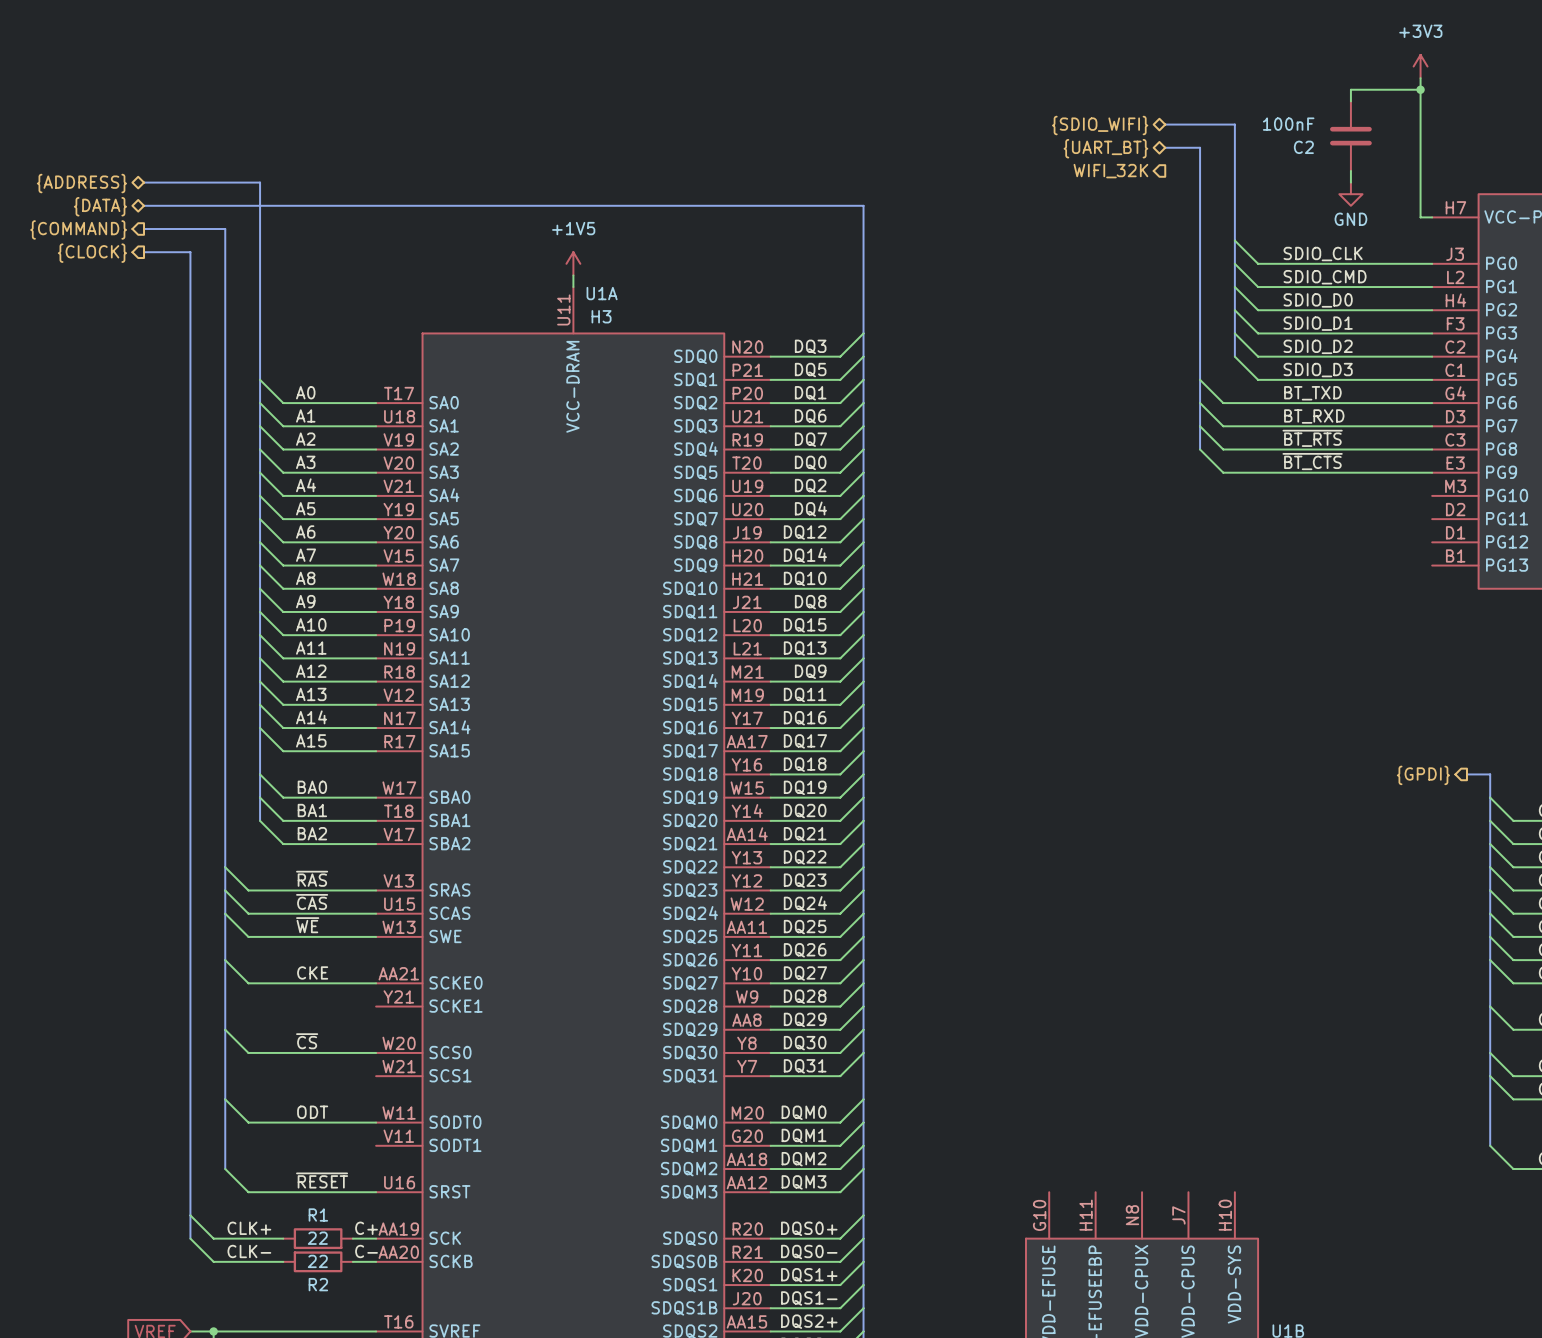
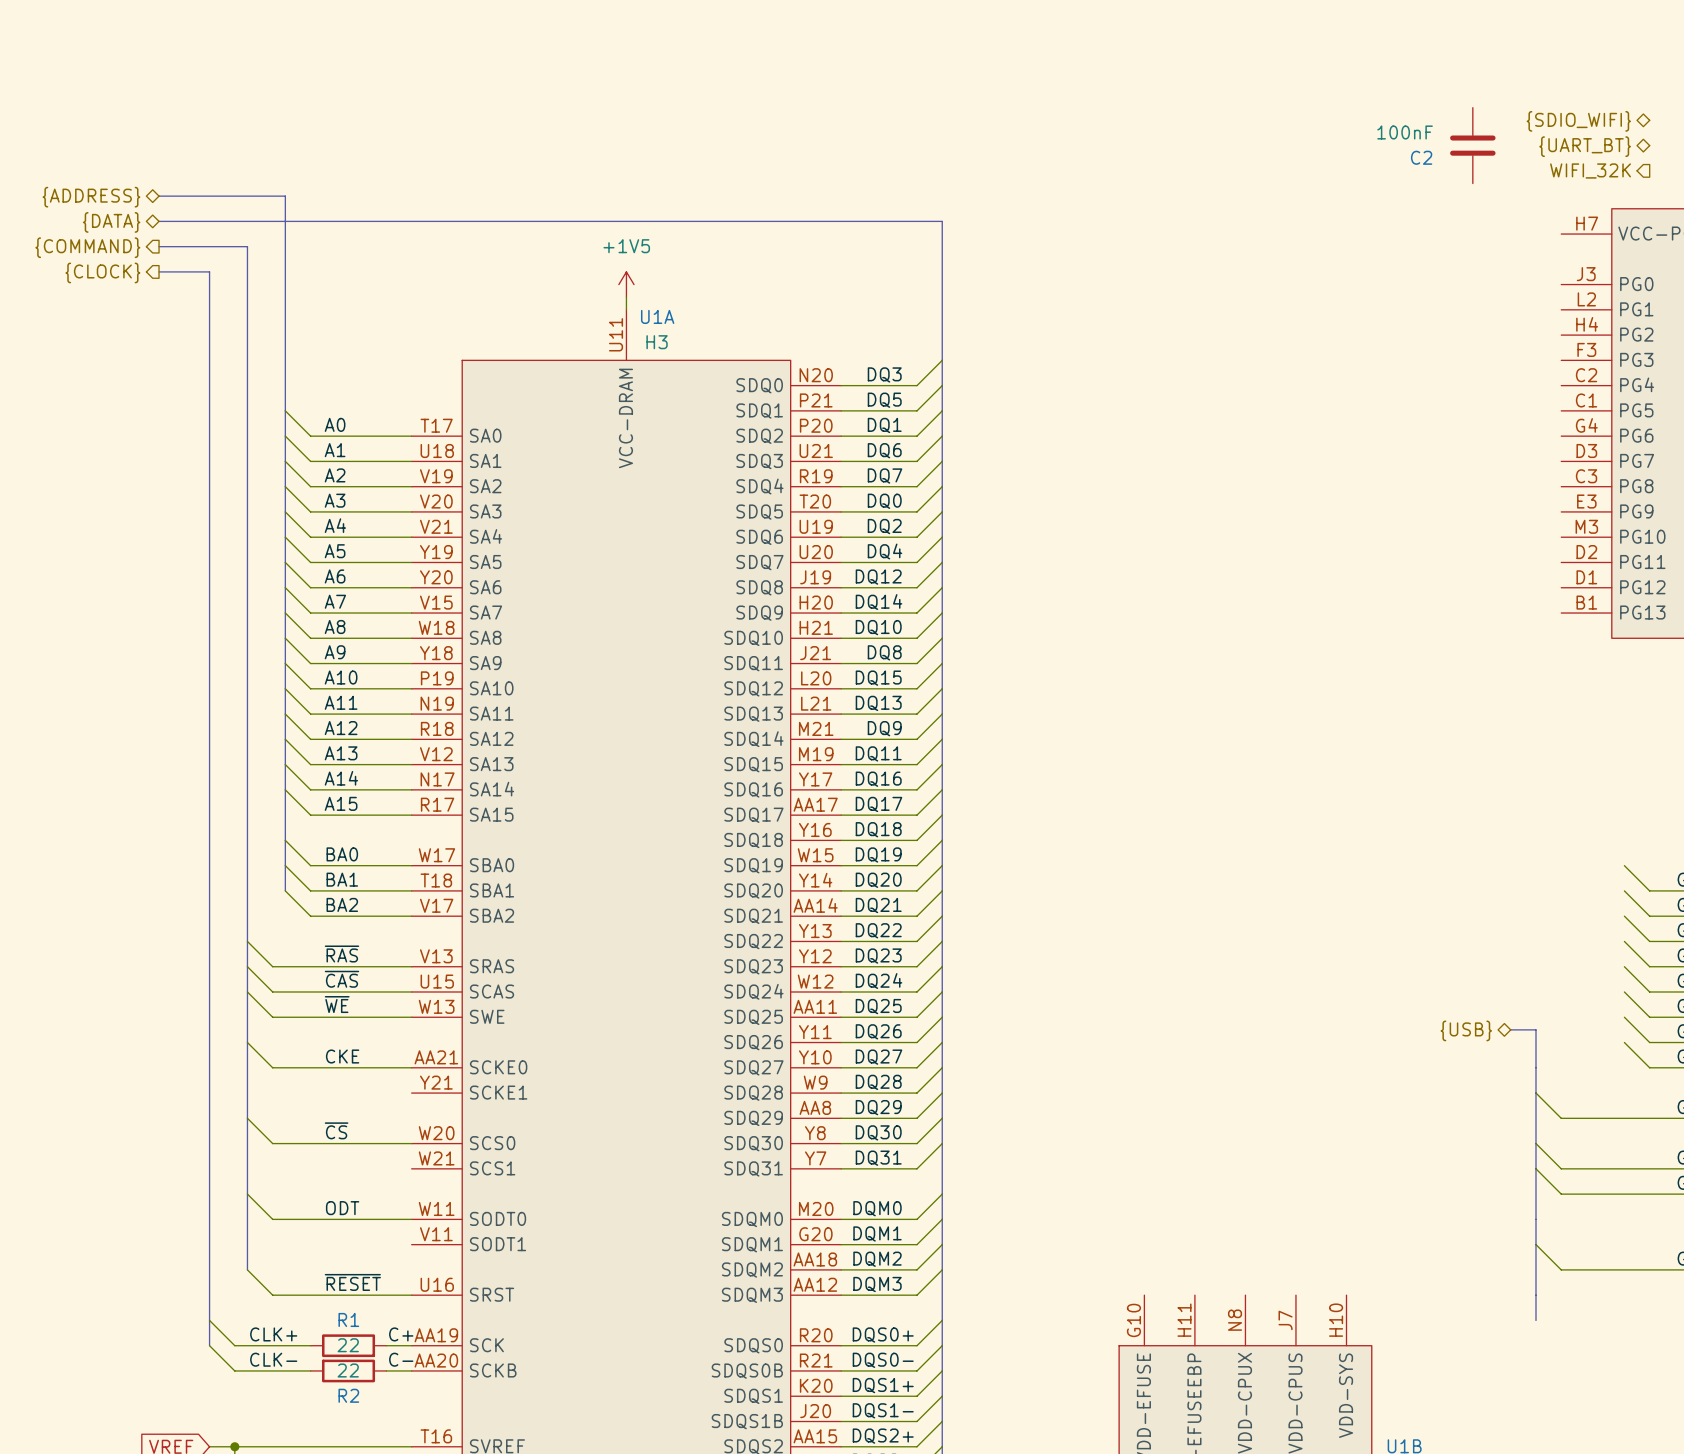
power symbol: +3V3 (1420, 66) -> none
wire: (1420, 78) (1420, 217) (1432, 217) -> none
wire: (1420, 89) (1350, 89) (1350, 101) -> none
junction: (1420, 89) -> none
hierarchical label: none -> {SDIO_WIFI} (1578, 121)
bus: (1165, 124) (1234, 124) (1234, 356) -> none
hierarchical label: {SDIO_WIFI} (1100, 125) -> none
hierarchical label: none -> {UART_BT} (1585, 146)
bus: (1165, 147) (1200, 147) (1200, 449) -> none
hierarchical label: {UART_BT} (1105, 148) -> none
hierarchical label: none -> WIFI_32K (1590, 170)
wire: (1350, 170) (1350, 182) -> none
hierarchical label: WIFI_32K (1110, 171) -> none
power symbol: GND (1350, 194) -> none
wire: (1234, 240) (1258, 263) (1432, 263) -> none
label: SDIO_CLK (1323, 254) -> none
wire: (1234, 263) (1258, 287) (1432, 287) -> none
label: SDIO_CMD (1325, 277) -> none
wire: (1234, 287) (1258, 310) (1432, 310) -> none
label: SDIO_D0 (1318, 300) -> none
wire: (1234, 310) (1258, 333) (1432, 333) -> none
label: SDIO_D1 (1318, 323) -> none
wire: (1234, 333) (1258, 356) (1432, 356) -> none
label: SDIO_D2 (1318, 346) -> none
wire: (1234, 356) (1258, 379) (1432, 379) -> none
label: SDIO_D3 (1318, 370) -> none
wire: (1200, 379) (1223, 403) (1432, 403) -> none
label: BT_TXD (1312, 393) -> none
wire: (1200, 403) (1223, 426) (1432, 426) -> none
label: BT_RXD (1314, 416) -> none
wire: (1200, 426) (1223, 449) (1432, 449) -> none
label: ~{BT_RTS} (1312, 438) -> none
wire: (1200, 449) (1223, 472) (1432, 472) -> none
label: ~{BT_CTS} (1312, 461) -> none
bus: (1466, 774) (1490, 774) (1490, 1145) -> none
hierarchical label: {GPDI} (1423, 775) -> none
bus: none -> (1510, 1029) (1535, 1029) (1535, 1320)
hierarchical label: none -> {USB} (1466, 1030)
wire: (1490, 1006) (1513, 1029) -> (1535, 1093) (1561, 1118) (1649, 1118)
wire: (1490, 1052) (1513, 1076) -> (1535, 1143) (1561, 1168) (1649, 1168)
wire: (1490, 1076) (1513, 1099) -> (1535, 1168) (1561, 1194) (1649, 1194)
wire: (1490, 1145) (1513, 1169) -> (1535, 1244) (1561, 1269) (1649, 1269)

